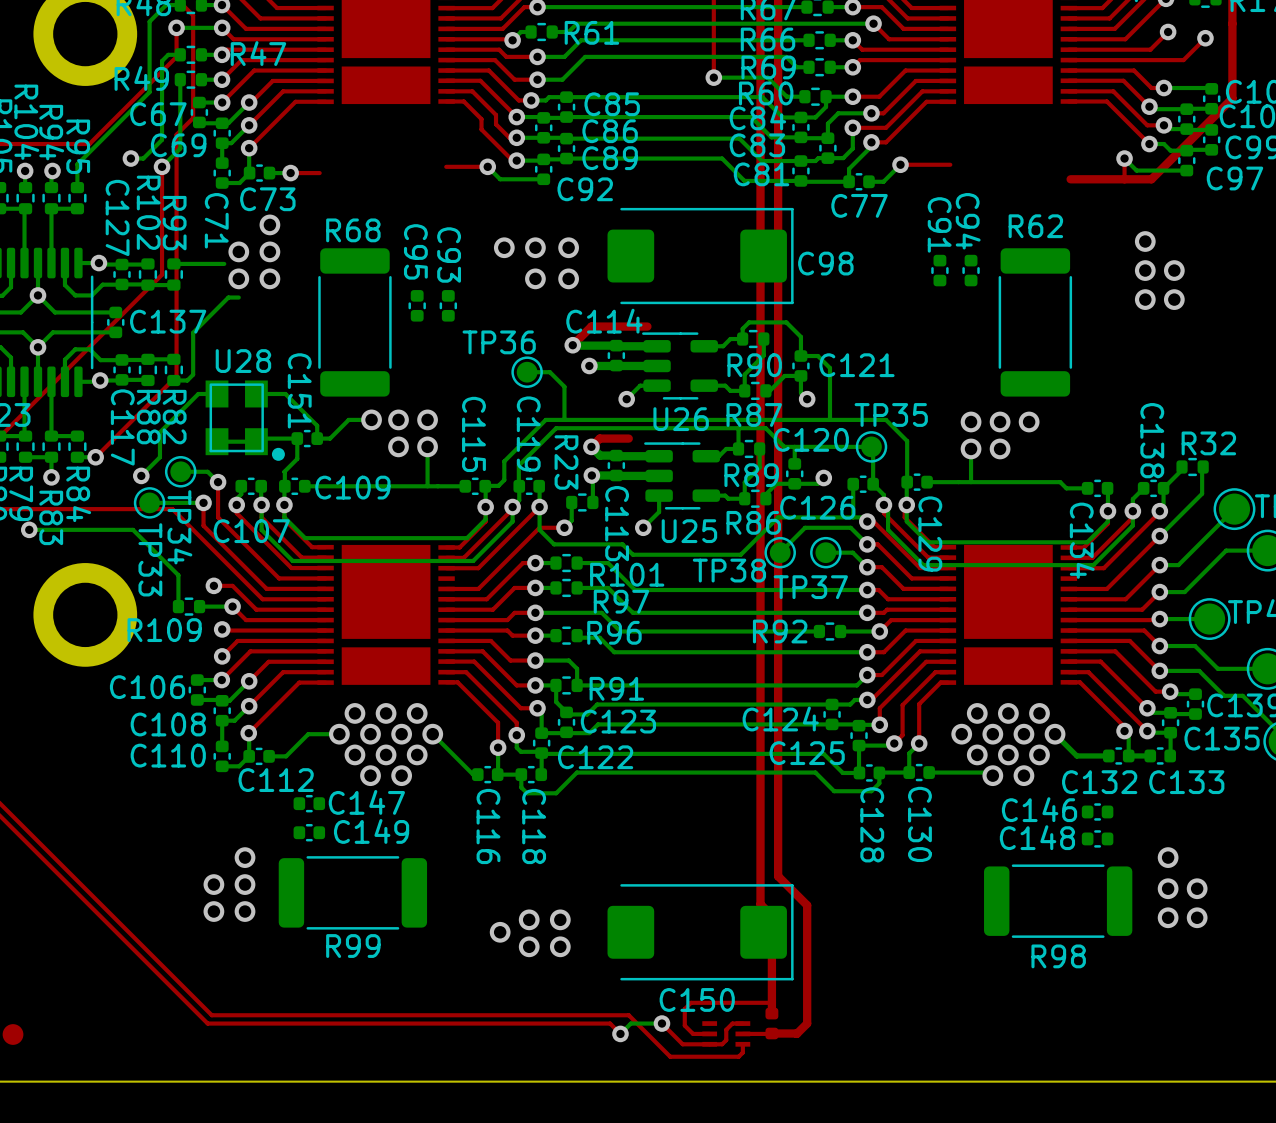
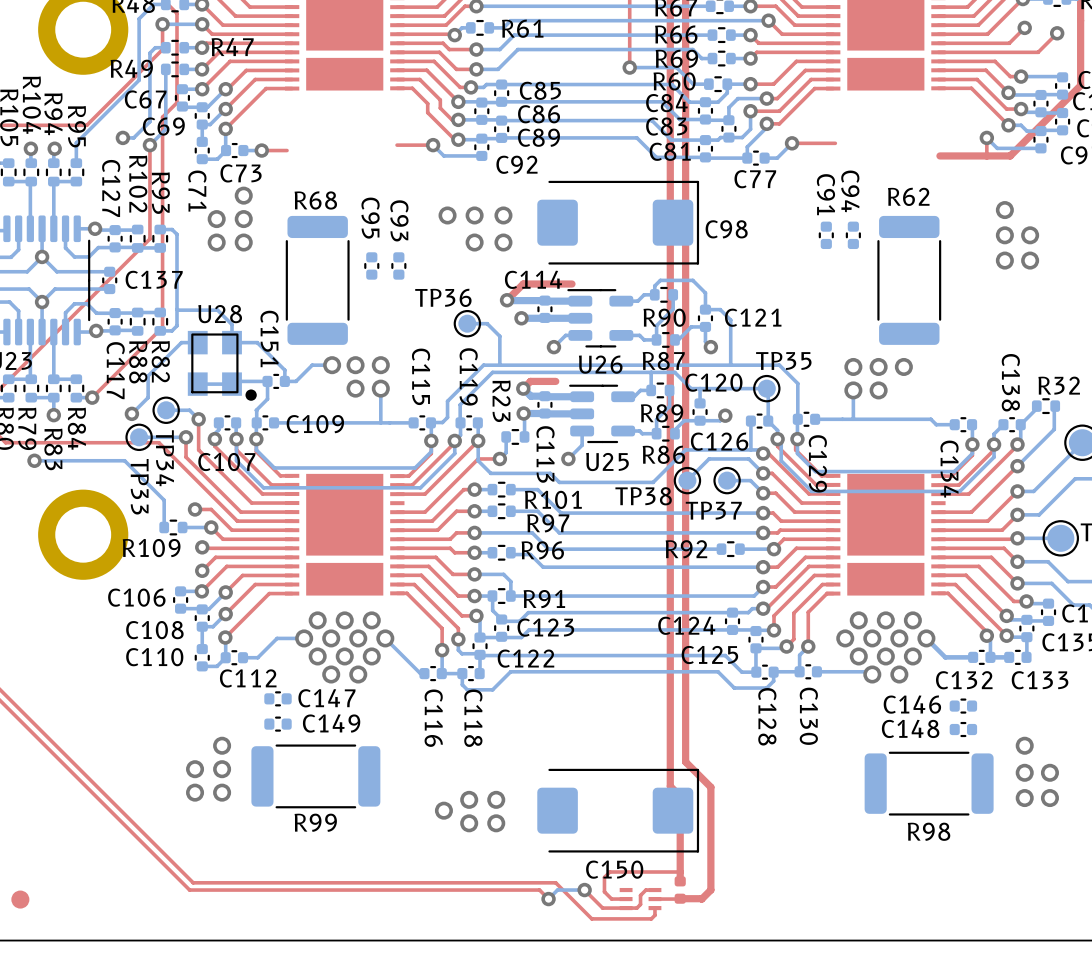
bottom track: (224, 263) (187, 263) -> none
bottom track: (238, 297) (228, 297) (193, 332) -> (172, 229) (177, 234) (177, 289)
bottom track: none -> (177, 309) (217, 310) (232, 324) (232, 342)

